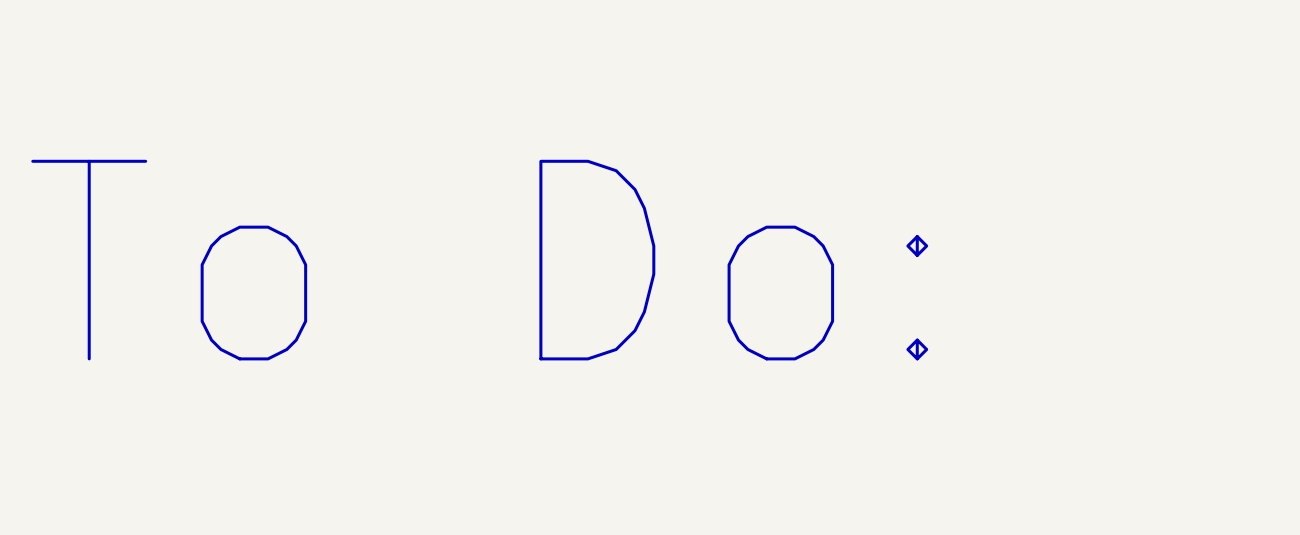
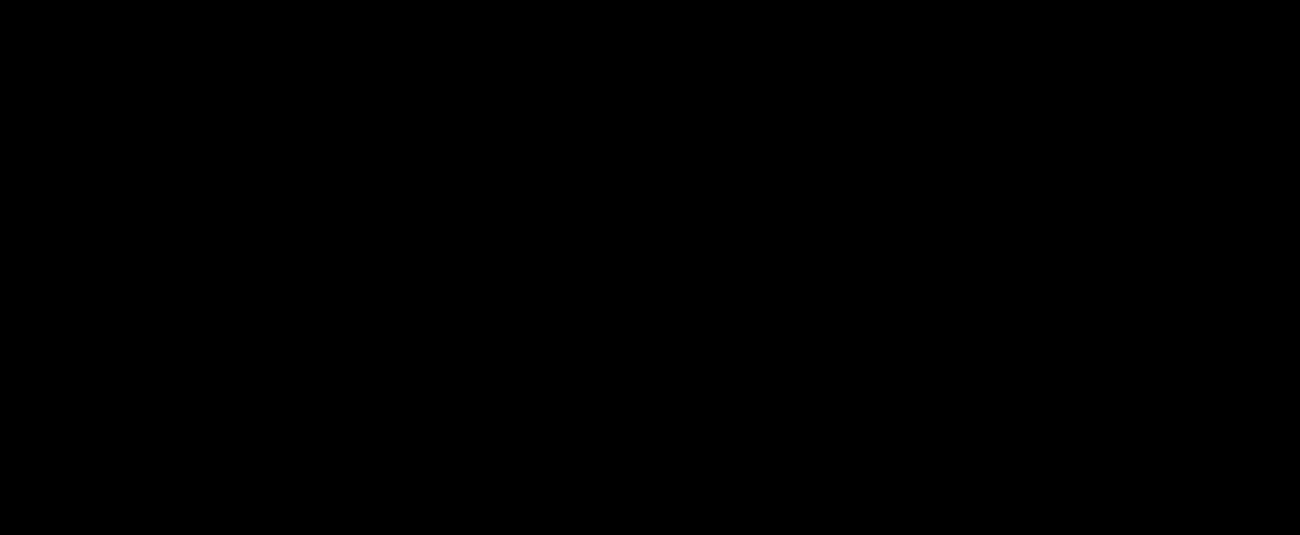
text: To Do: (479, 260) -> none

